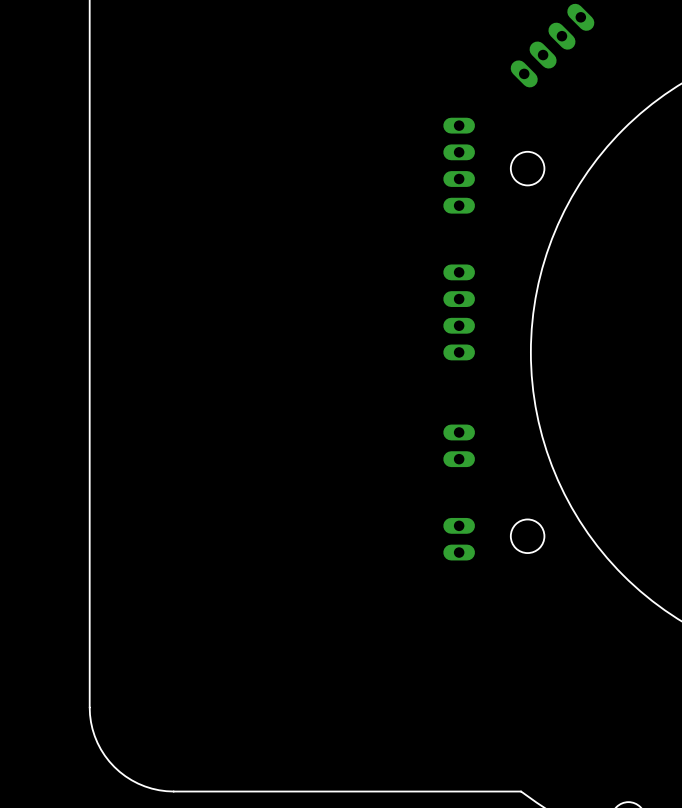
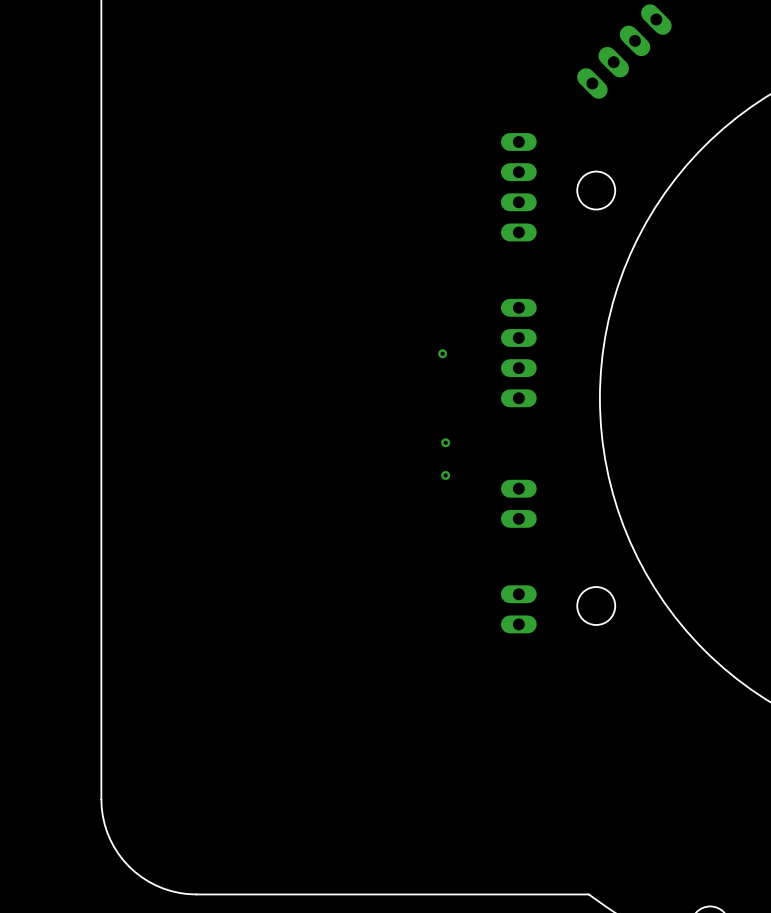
via: none -> (442, 353)
via: none -> (445, 442)
via: none -> (445, 475)

